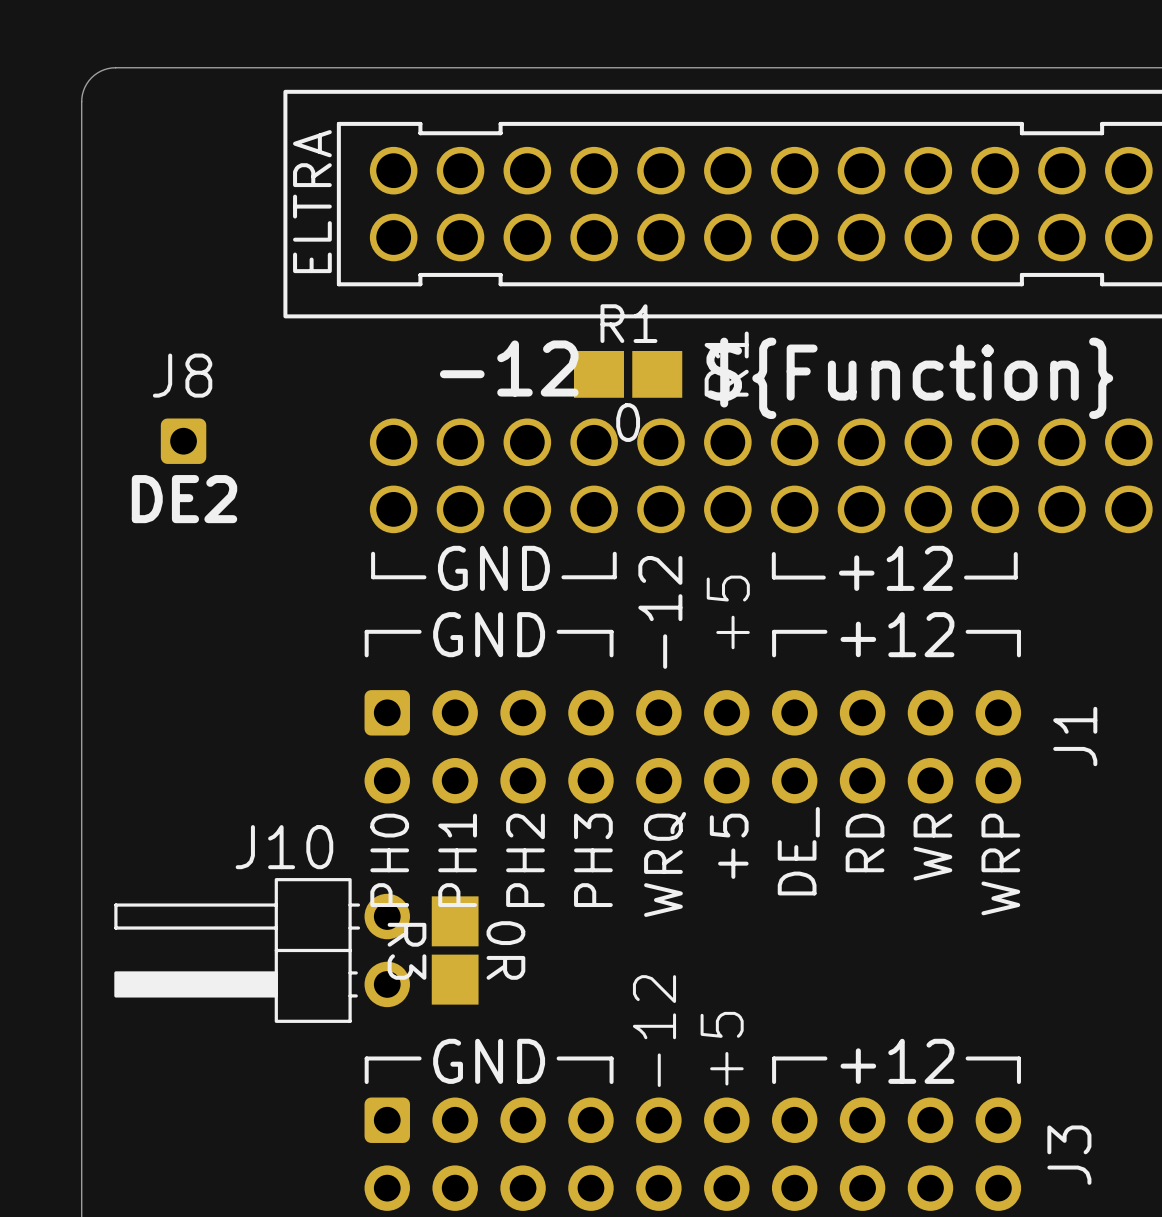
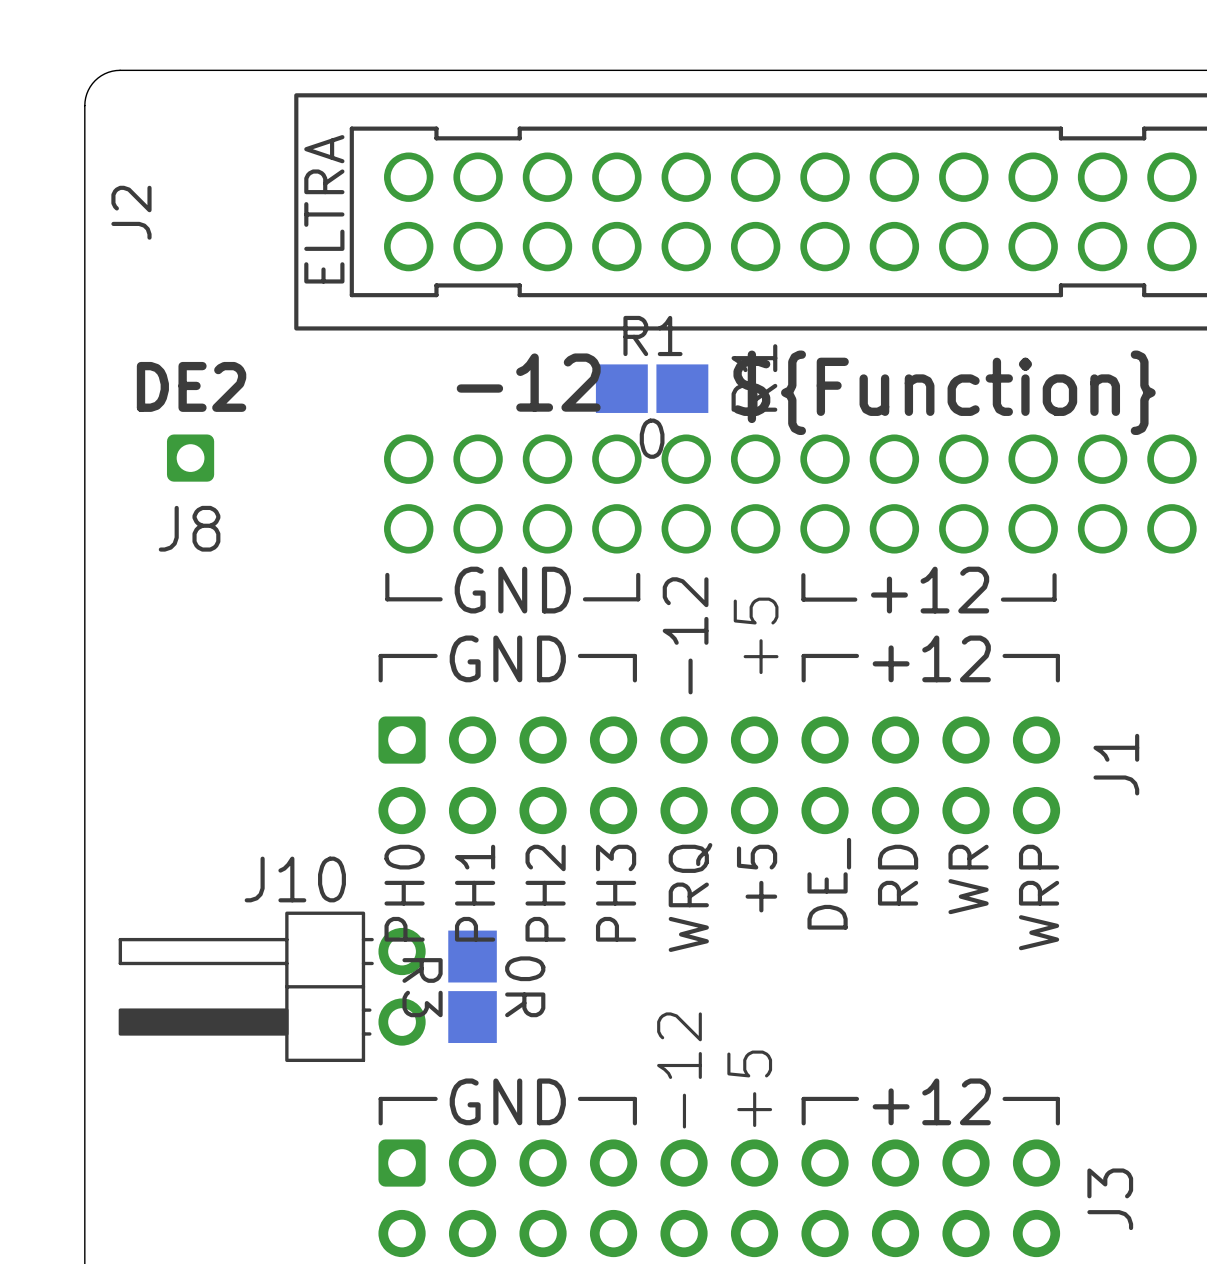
text: none -> J2 (131, 212)
text: J8 (182, 375) -> DE2 (191, 386)
text: DE2 (184, 499) -> J8 (189, 528)

